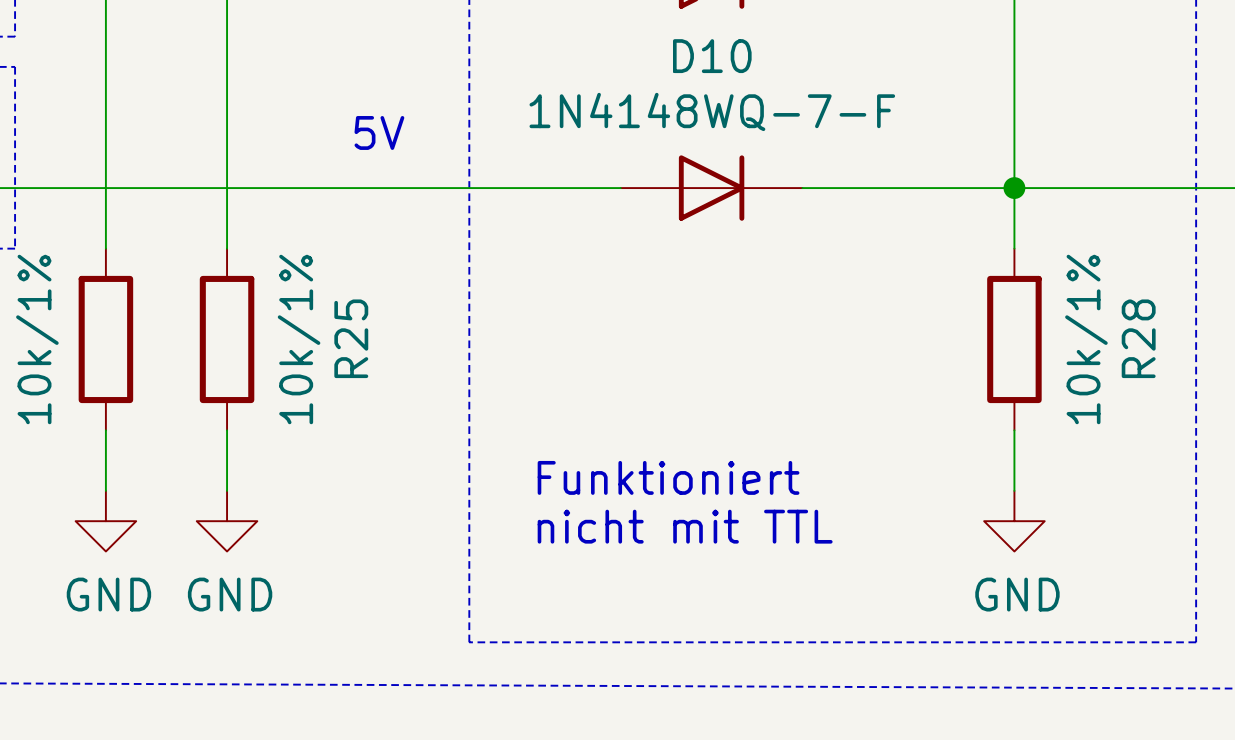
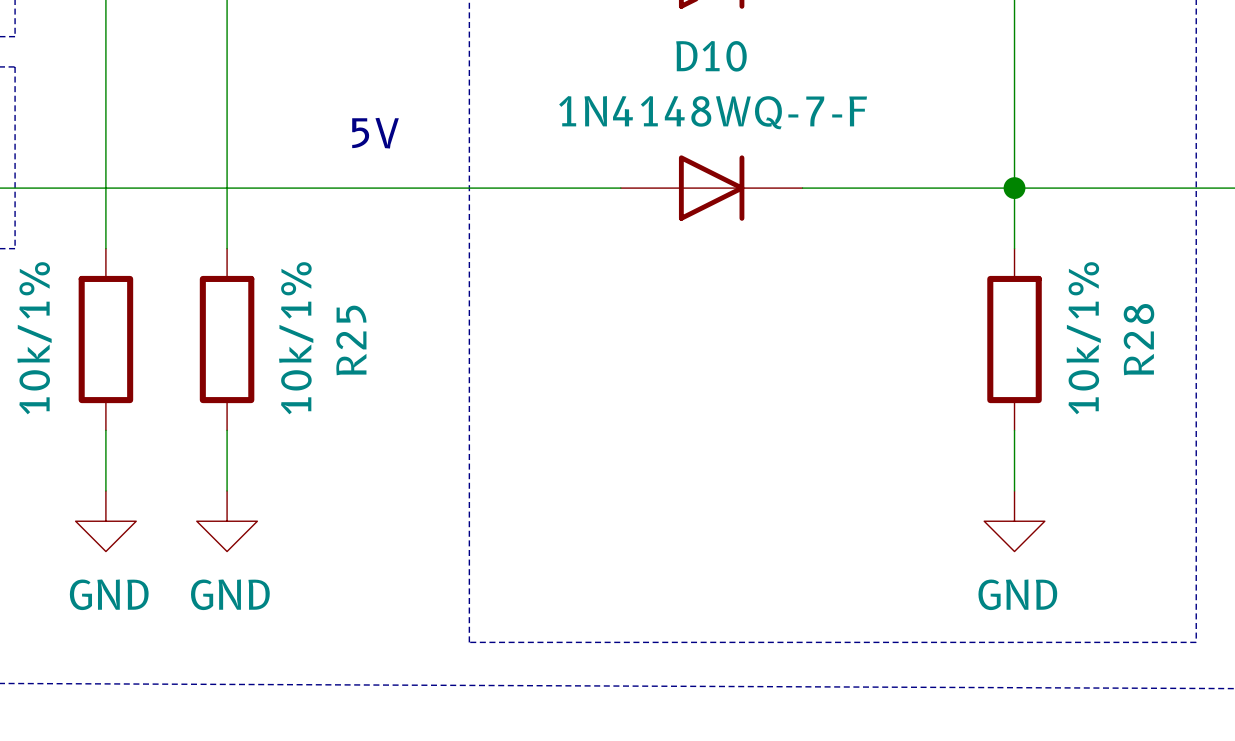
text: Funktioniert (668, 477) -> none
text: nicht mit TTL (685, 526) -> none

